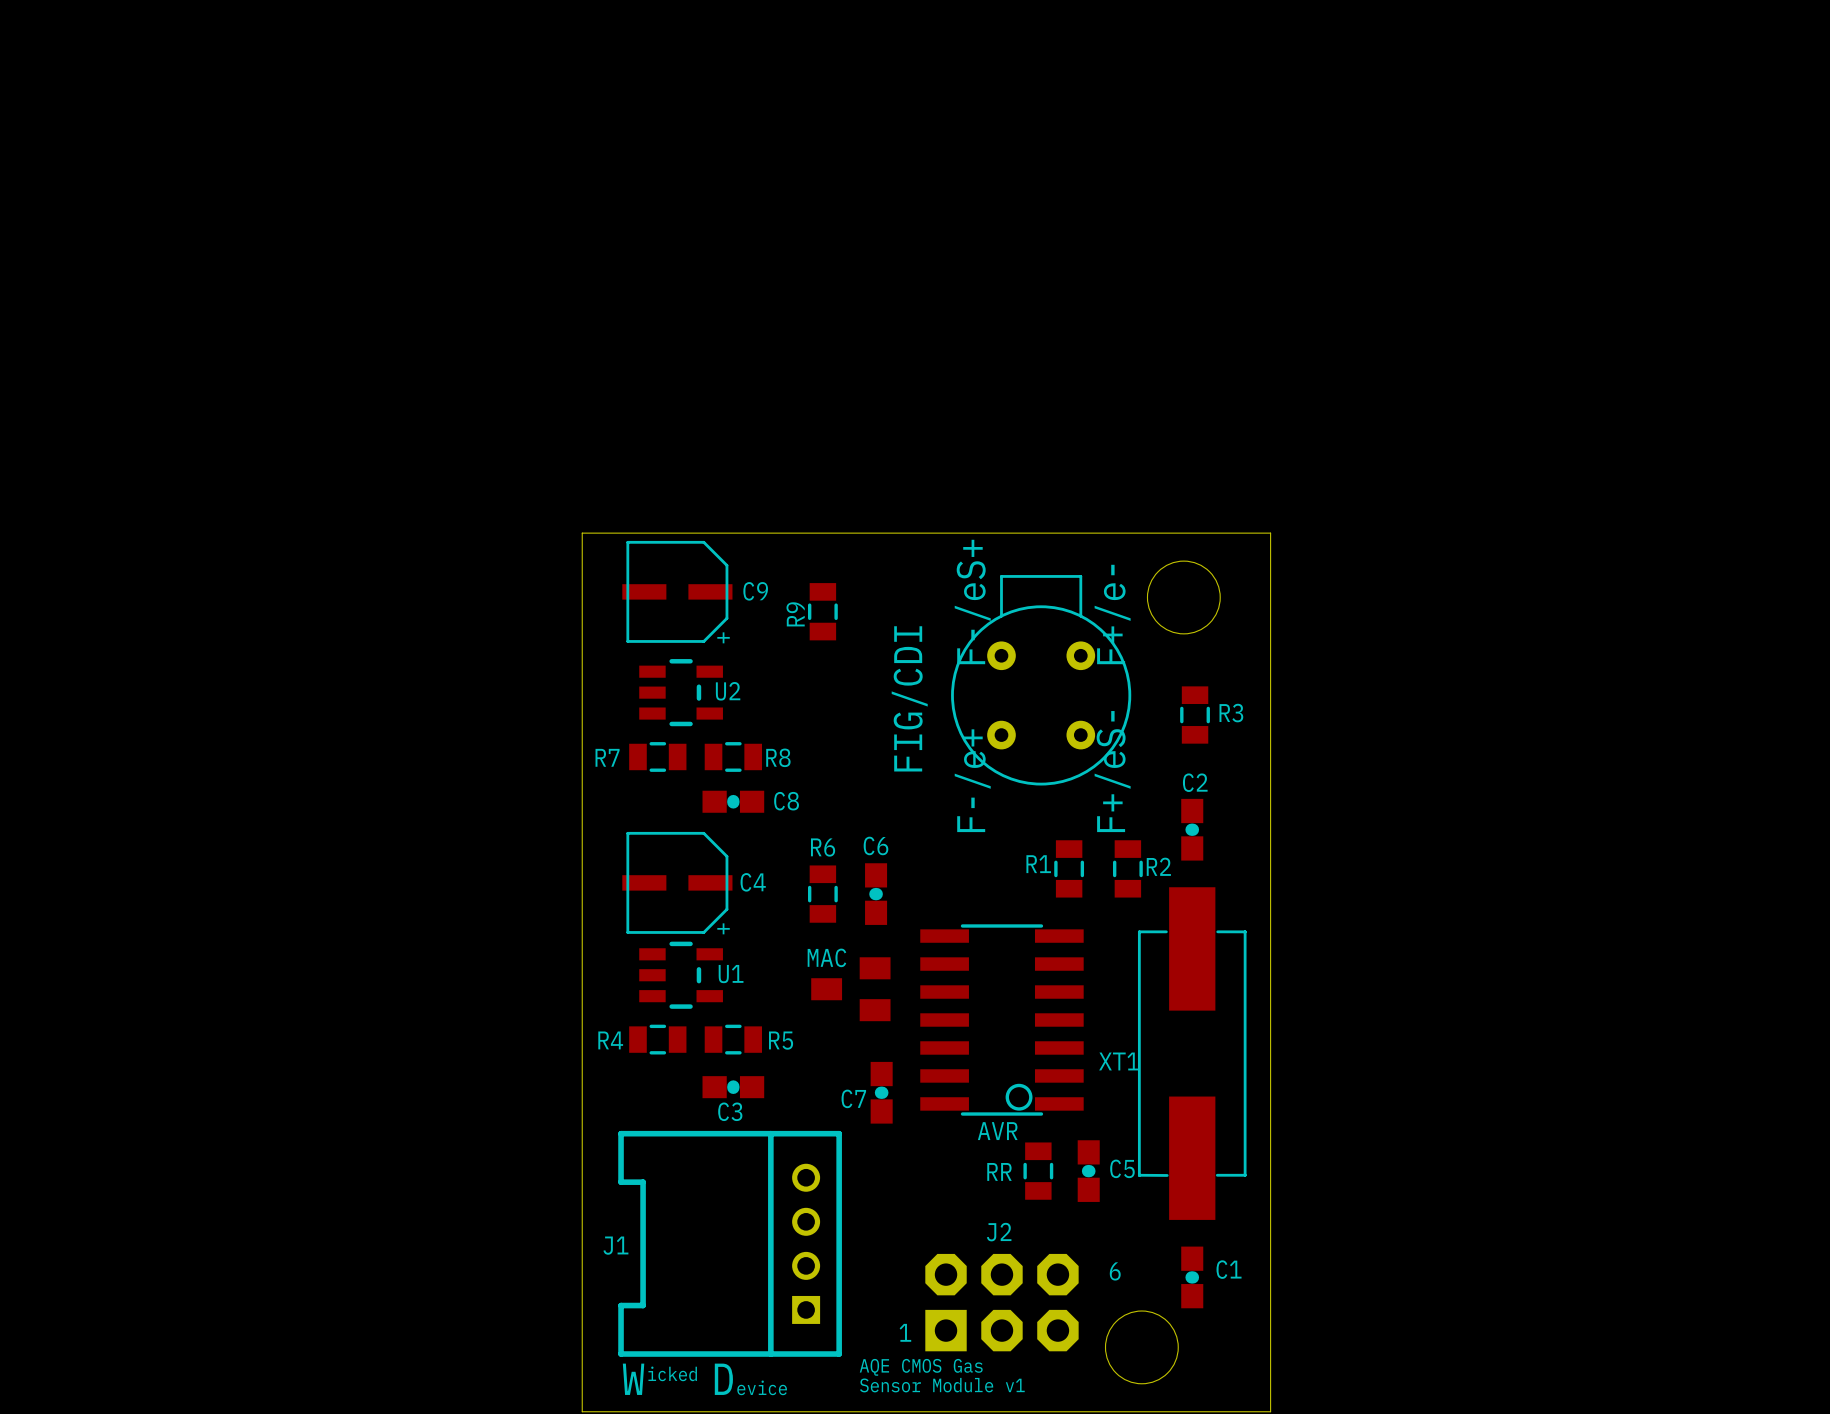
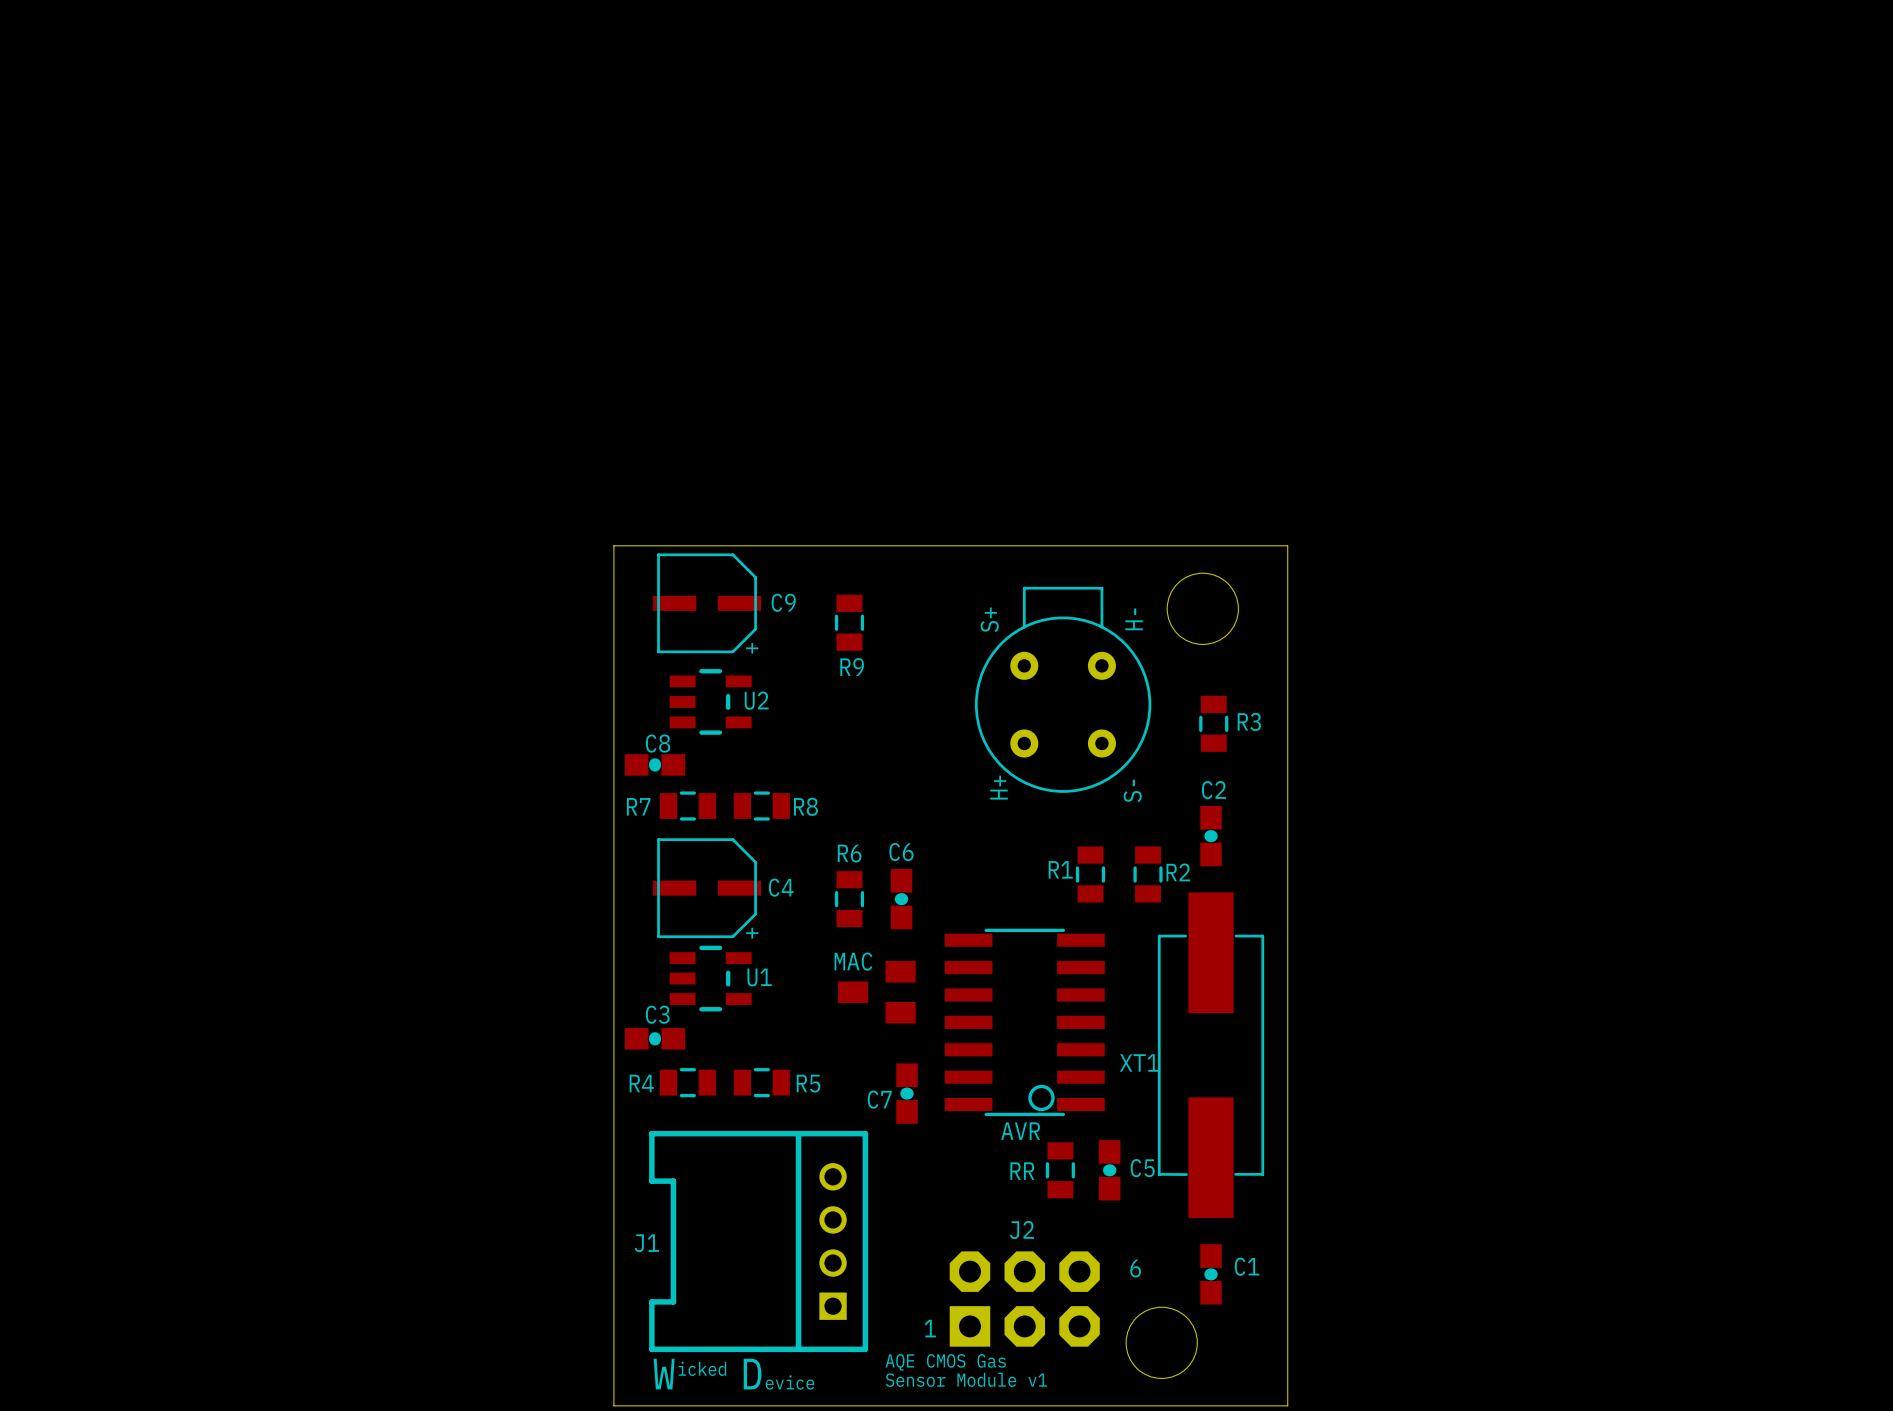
part footprint: [951, 575, 1132, 786] -> [974, 586, 1152, 793]
R9 name rotation: 0° (795, 614) -> 90° clockwise (852, 666)
R9 name position: R9 (795, 614) -> R9 (852, 666)
R7 position: (657, 756) -> (687, 806)
R8 position: (733, 756) -> (761, 806)
C8 position: (733, 801) -> (655, 764)
C8 name position: C8 (786, 801) -> C8 (658, 743)
R4 position: (657, 1039) -> (687, 1082)
R5 position: (733, 1039) -> (761, 1082)
C3 position: (733, 1087) -> (655, 1038)
C3 name position: C3 (730, 1111) -> C3 (657, 1014)

